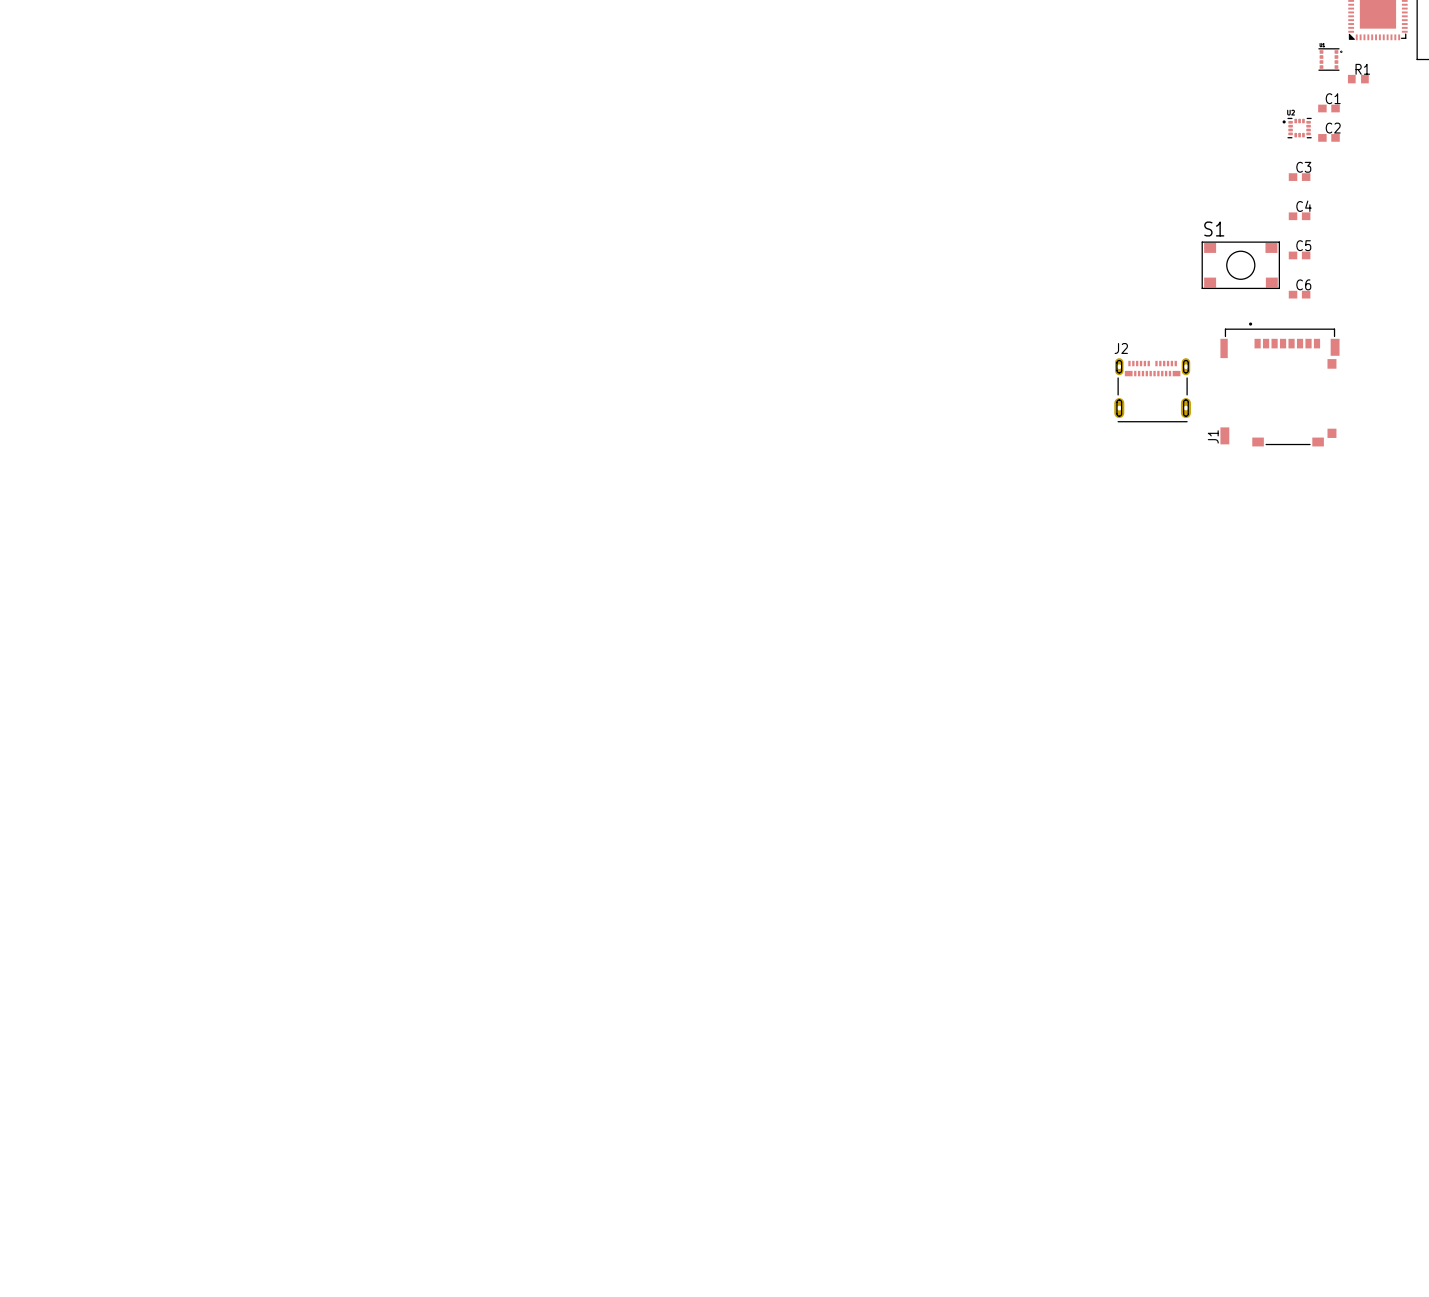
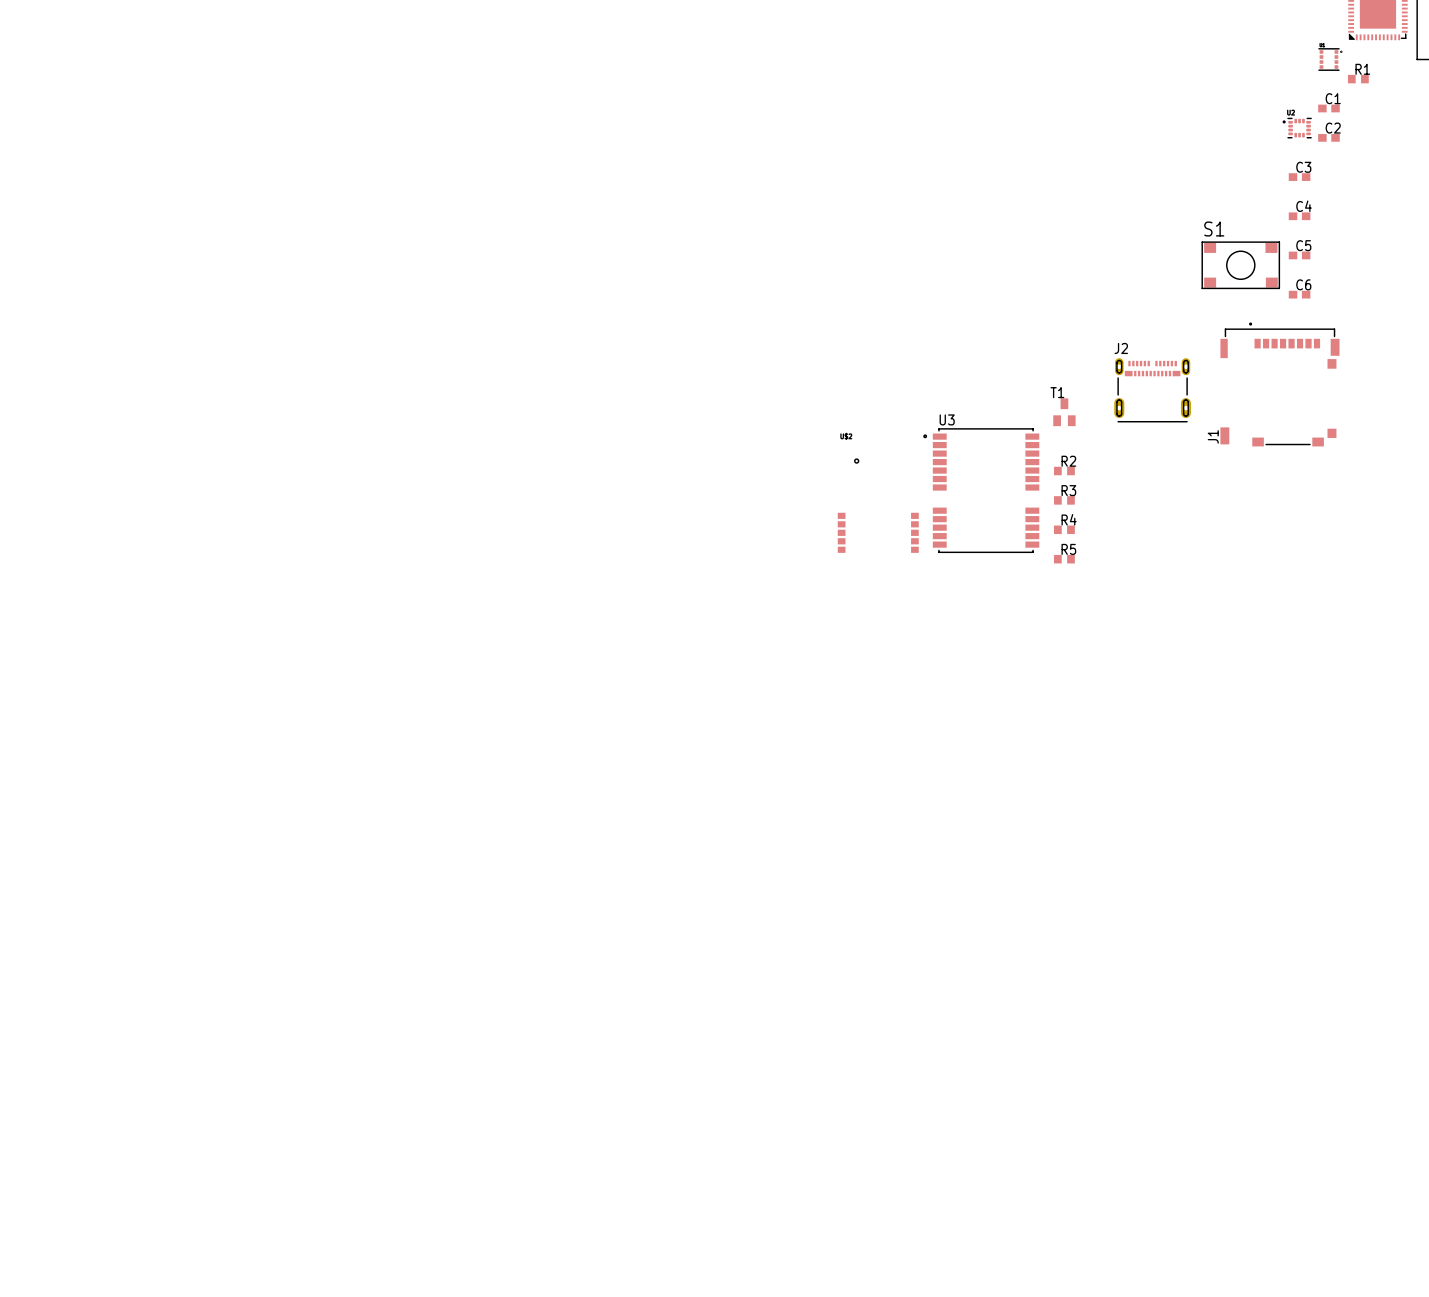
T1: none -> (1064, 412)
R2: none -> (1064, 471)
U3: none -> (981, 490)
R3: none -> (1064, 500)
part: none -> (878, 505)
R4: none -> (1064, 529)
R5: none -> (1064, 559)

